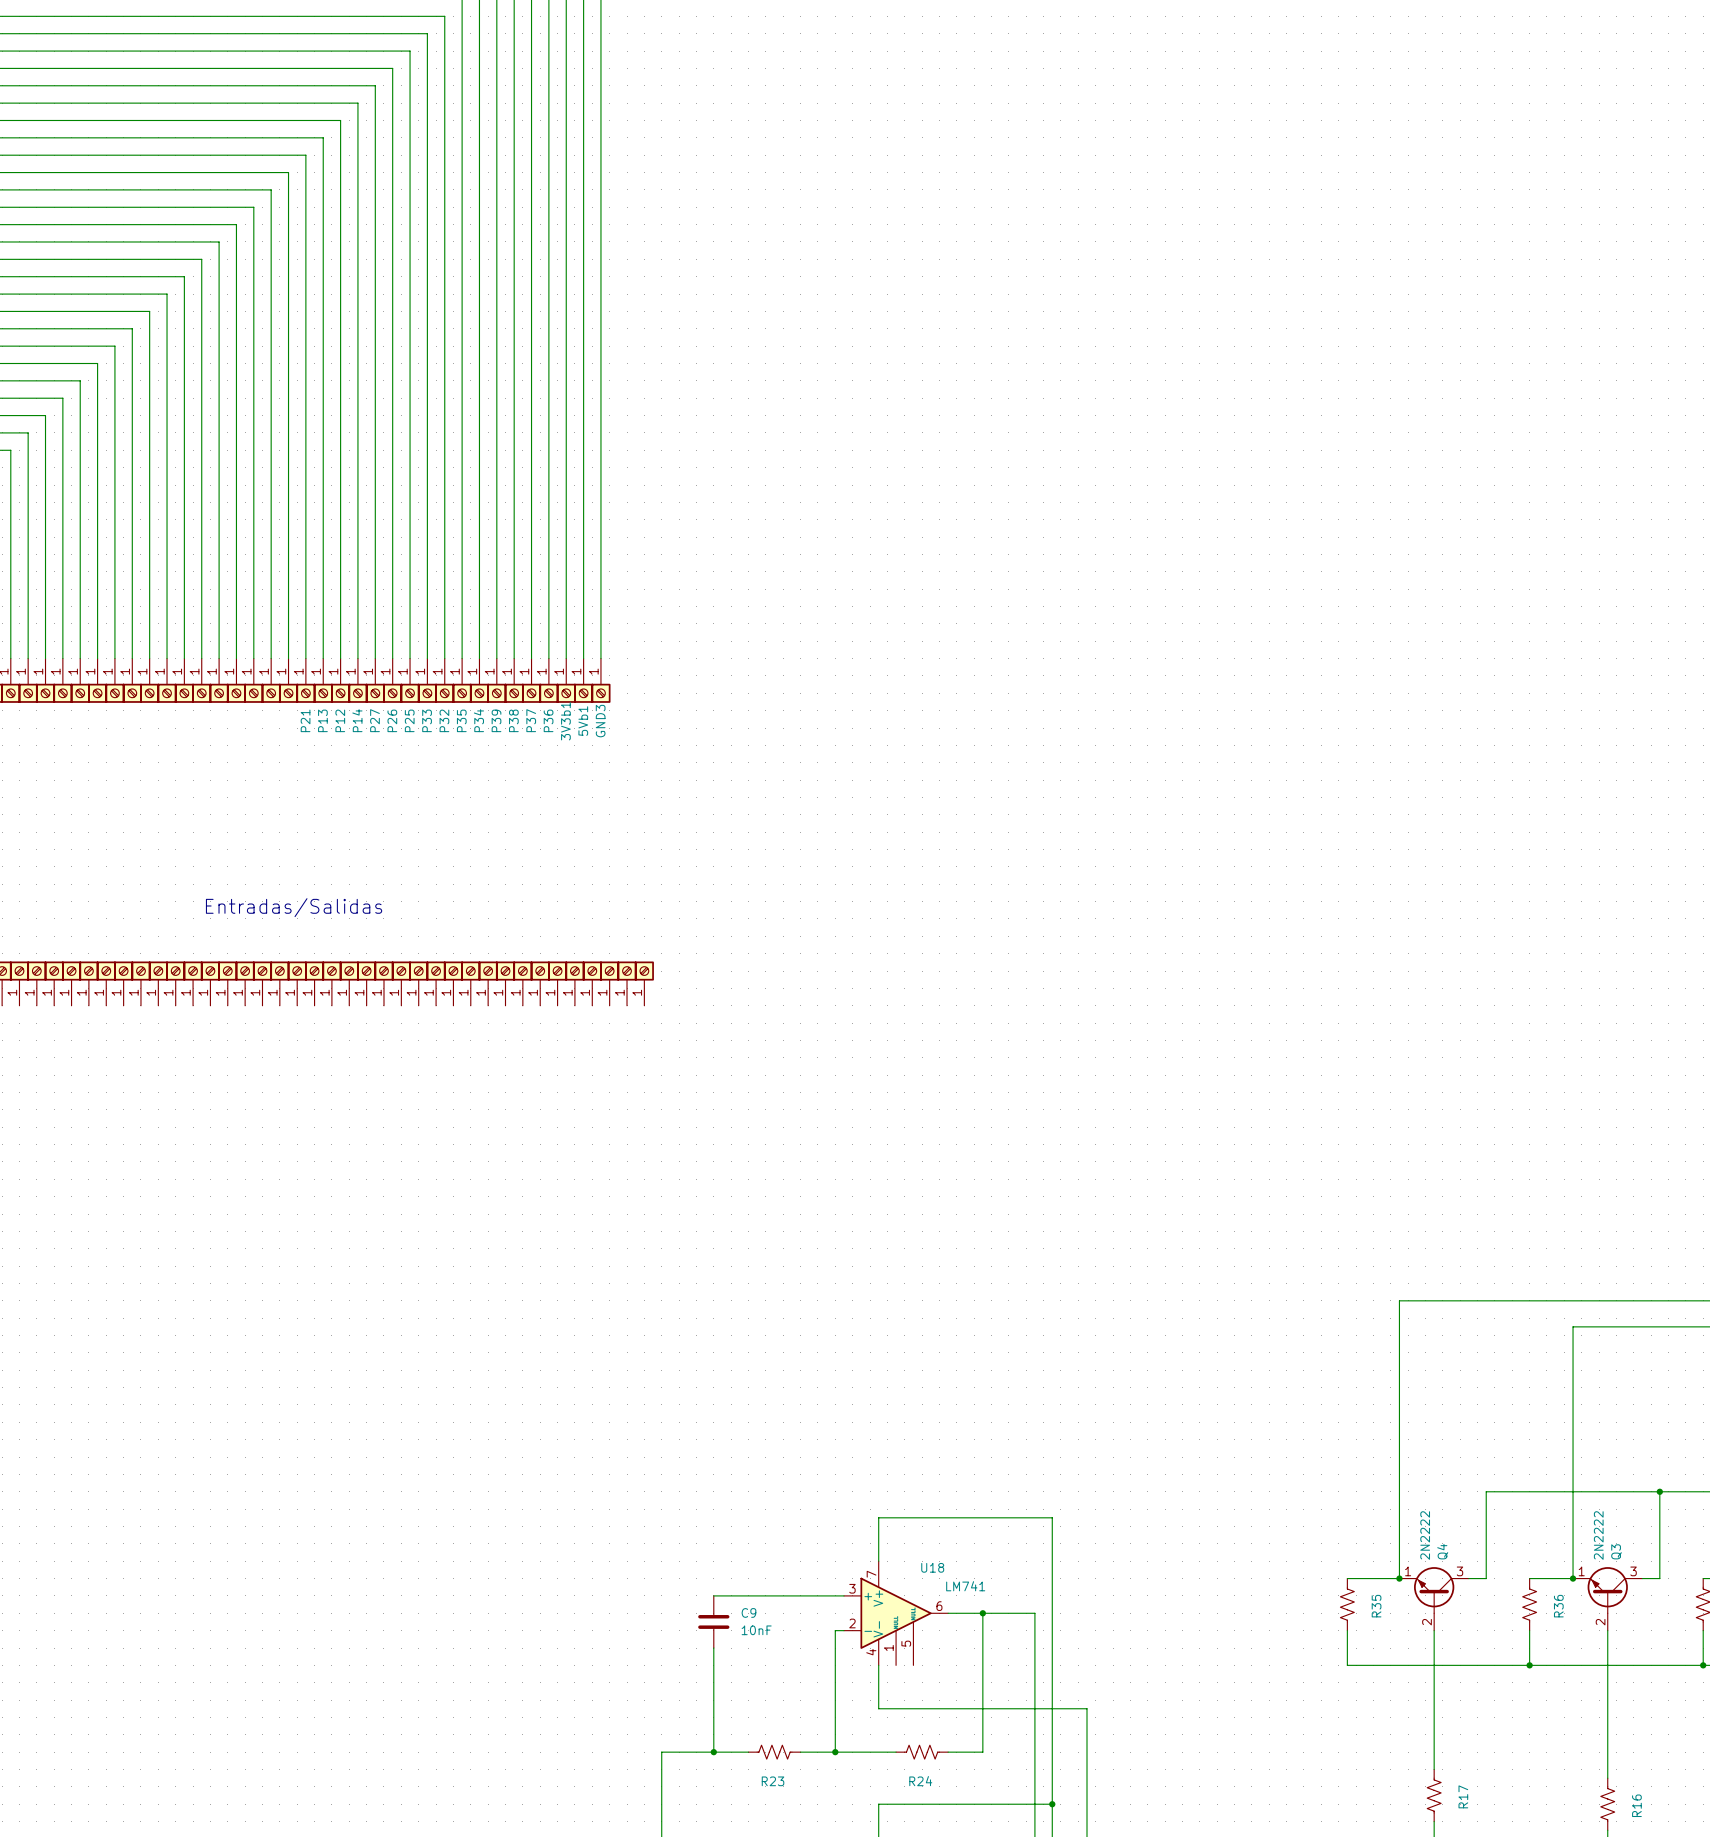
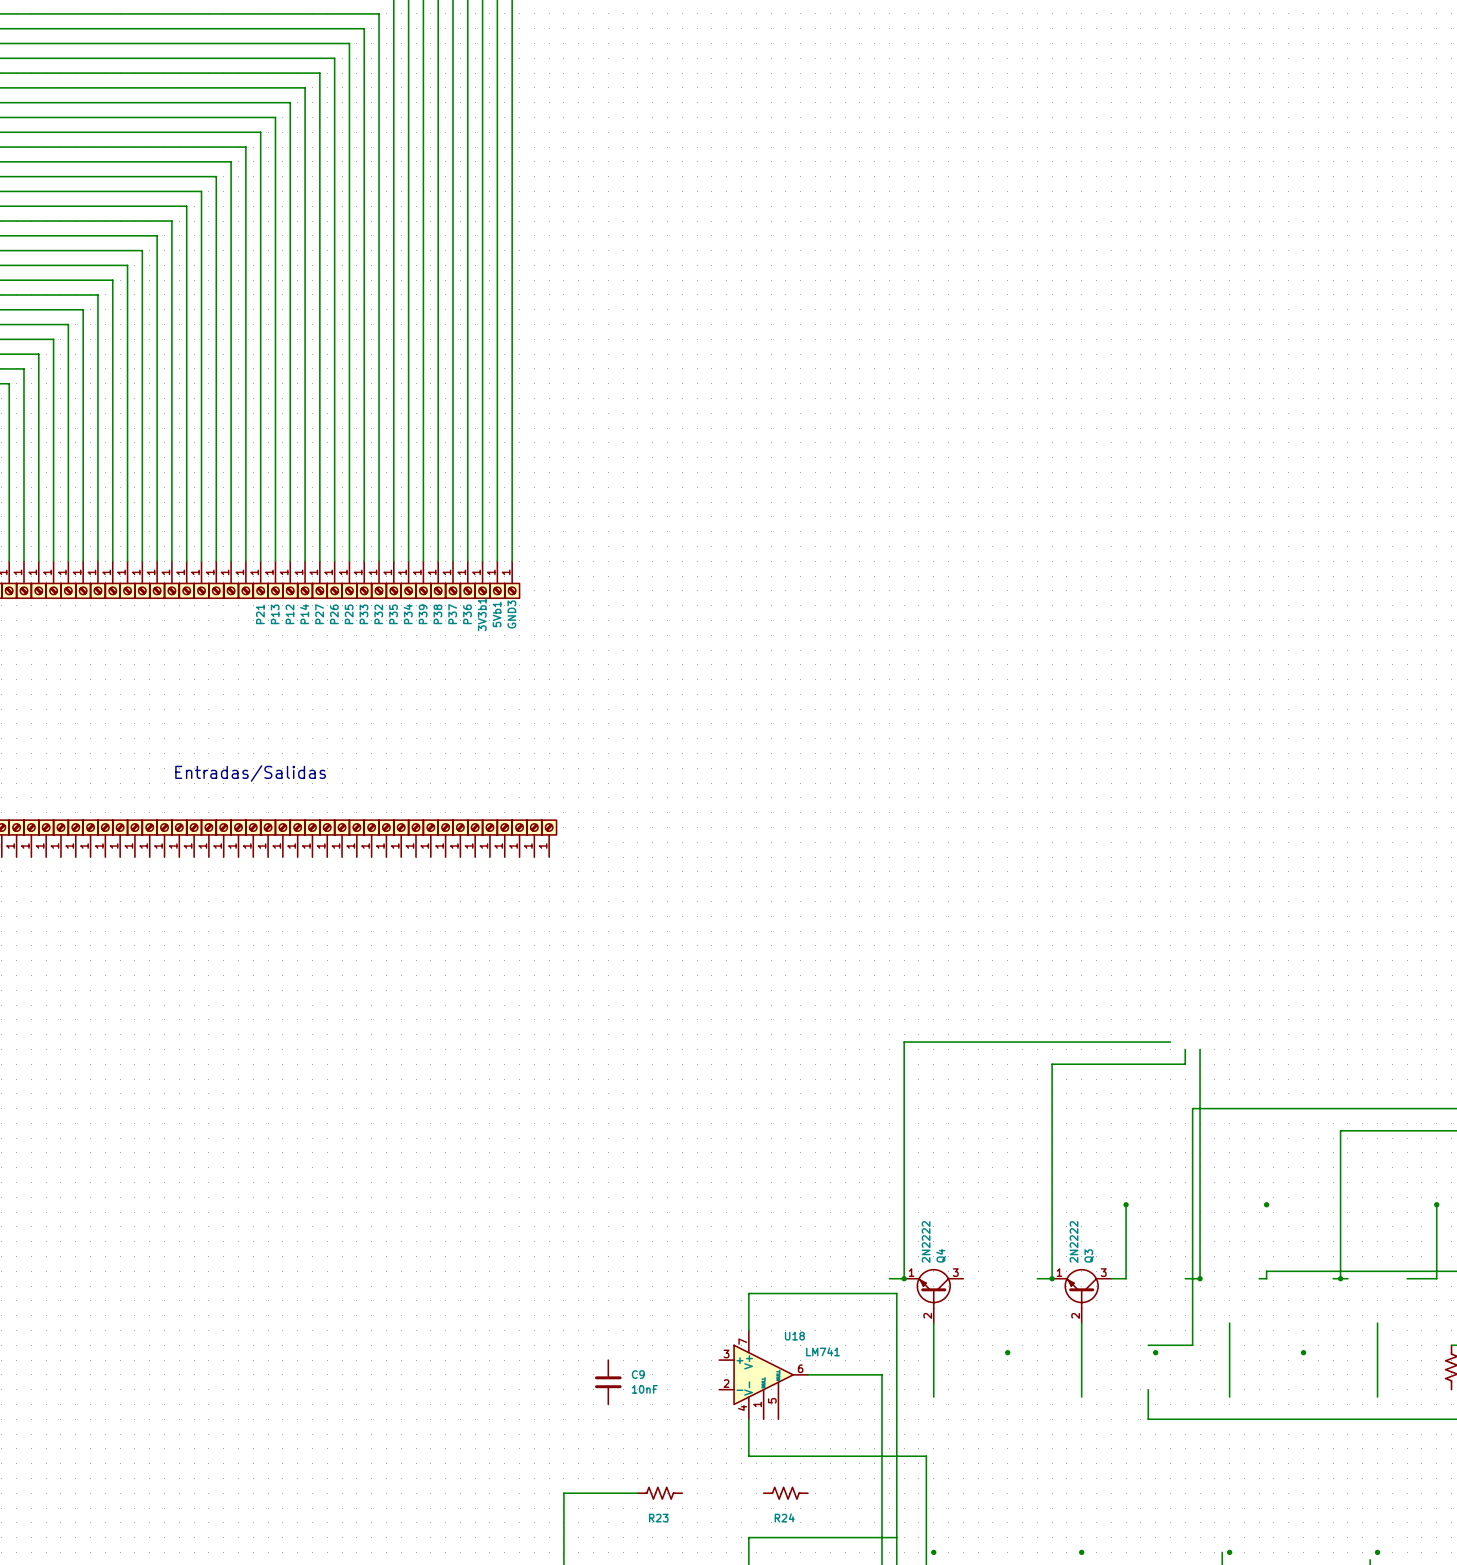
wire: none -> (1170, 1042) (904, 1042) (904, 1278) (889, 1278)
wire: none -> (1185, 1049) (1185, 1064) (1052, 1064) (1052, 1278) (1037, 1278)
wire: none -> (1200, 1049) (1200, 1278) (1185, 1278)
wire: none -> (1126, 1204) (1126, 1278) (1111, 1278)
junction: none -> (1126, 1204)
junction: none -> (1266, 1204)
wire: none -> (1436, 1204) (1436, 1278) (1407, 1278)
junction: none -> (1436, 1204)
wire: (1659, 1491) (1659, 1578) (1642, 1578) -> none
junction: (1659, 1491) -> none
junction: none -> (904, 1278)
junction: none -> (1052, 1278)
junction: none -> (1200, 1278)
wire: (1486, 1500) (1486, 1578) (1468, 1578) -> (1266, 1278) (1259, 1278)
wire: none -> (1333, 1278) (1347, 1278)
wire: (1573, 1500) (1573, 1578) (1529, 1578) -> none
junction: none -> (1340, 1278)
wire: none -> (933, 1323) (933, 1397)
wire: none -> (1081, 1323) (1081, 1397)
wire: none -> (1229, 1323) (1229, 1397)
wire: none -> (1377, 1323) (1377, 1397)
junction: (1399, 1578) -> none
junction: (1573, 1578) -> none
junction: none -> (1007, 1352)
junction: none -> (1155, 1352)
junction: none -> (1303, 1352)
wire: (713, 1595) (843, 1595) -> none
Q4 position: (1434, 1598) -> (933, 1296)
Q3 position: (1607, 1598) -> (1081, 1296)
R35: (1347, 1604) -> none
R36: (1529, 1604) -> none
wire: (982, 1613) (982, 1752) (948, 1752) -> none
junction: (982, 1613) -> none
wire: (843, 1630) (835, 1630) (835, 1752) -> none
wire: (1434, 1630) (1434, 1769) -> none
wire: (1529, 1630) (1529, 1665) -> none
wire: (1607, 1630) (1607, 1778) -> none
wire: (1703, 1630) (1703, 1665) -> none
wire: (713, 1648) (713, 1752) -> none
junction: (1529, 1665) -> none
junction: (1703, 1665) -> none
junction: (713, 1752) -> none
wire: (800, 1752) (896, 1752) -> none
junction: (835, 1752) -> none
R17: (1434, 1795) -> none
junction: (1052, 1804) -> none
R16: (1607, 1804) -> none
junction: none -> (933, 1552)
junction: none -> (1081, 1552)
junction: none -> (1229, 1552)
junction: none -> (1377, 1552)

